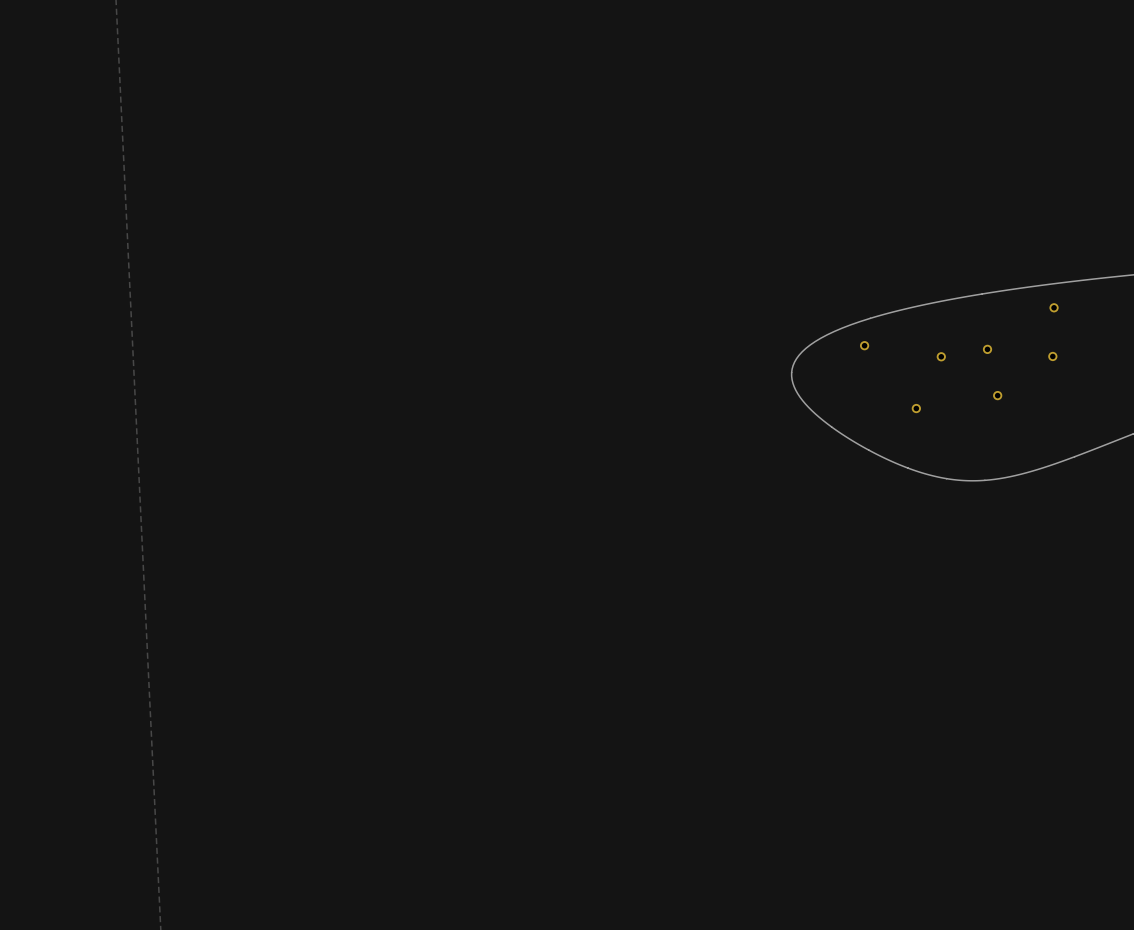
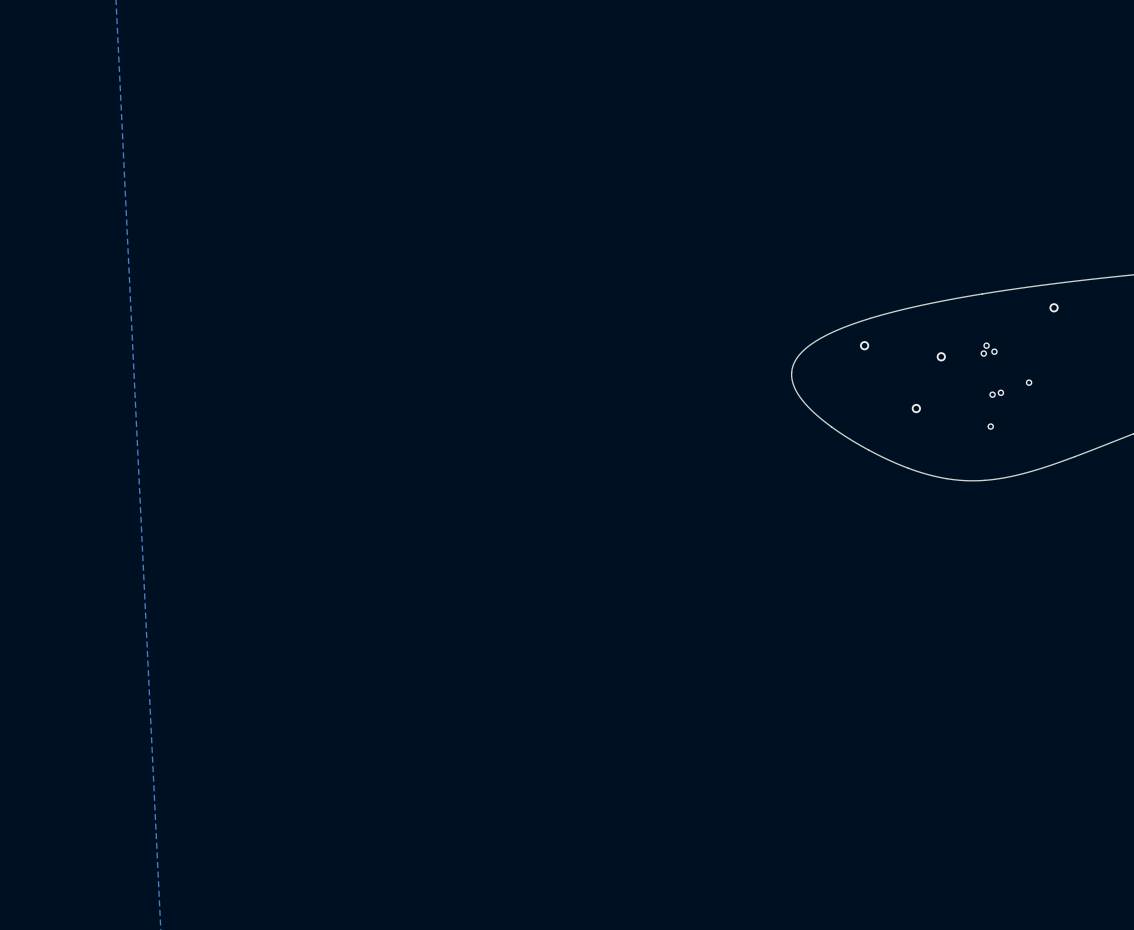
via: none -> (986, 345)
via: (987, 349) -> none
via: none -> (994, 351)
via: none -> (983, 353)
via: (1052, 356) -> none
via: none -> (1029, 382)
via: none -> (1000, 392)
via: none -> (992, 394)
via: (997, 395) -> none
via: none -> (990, 426)

